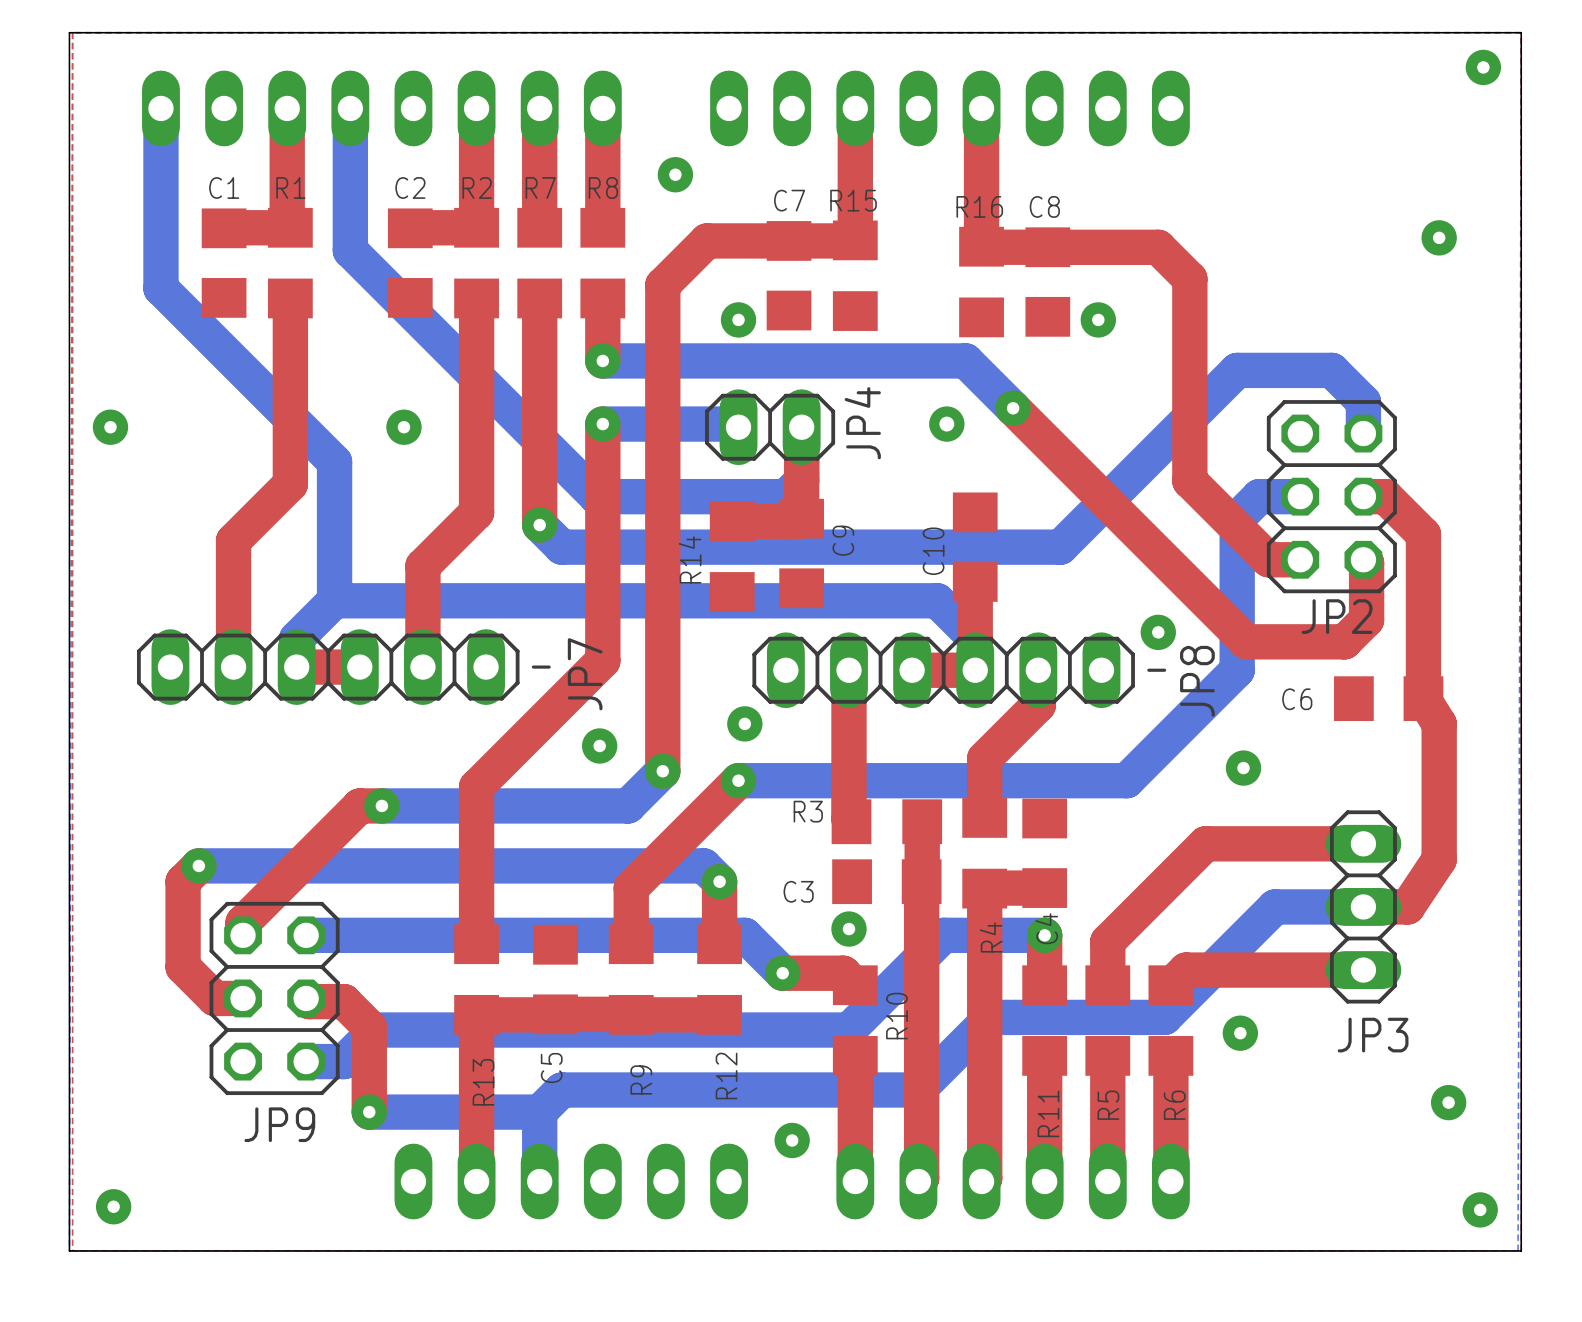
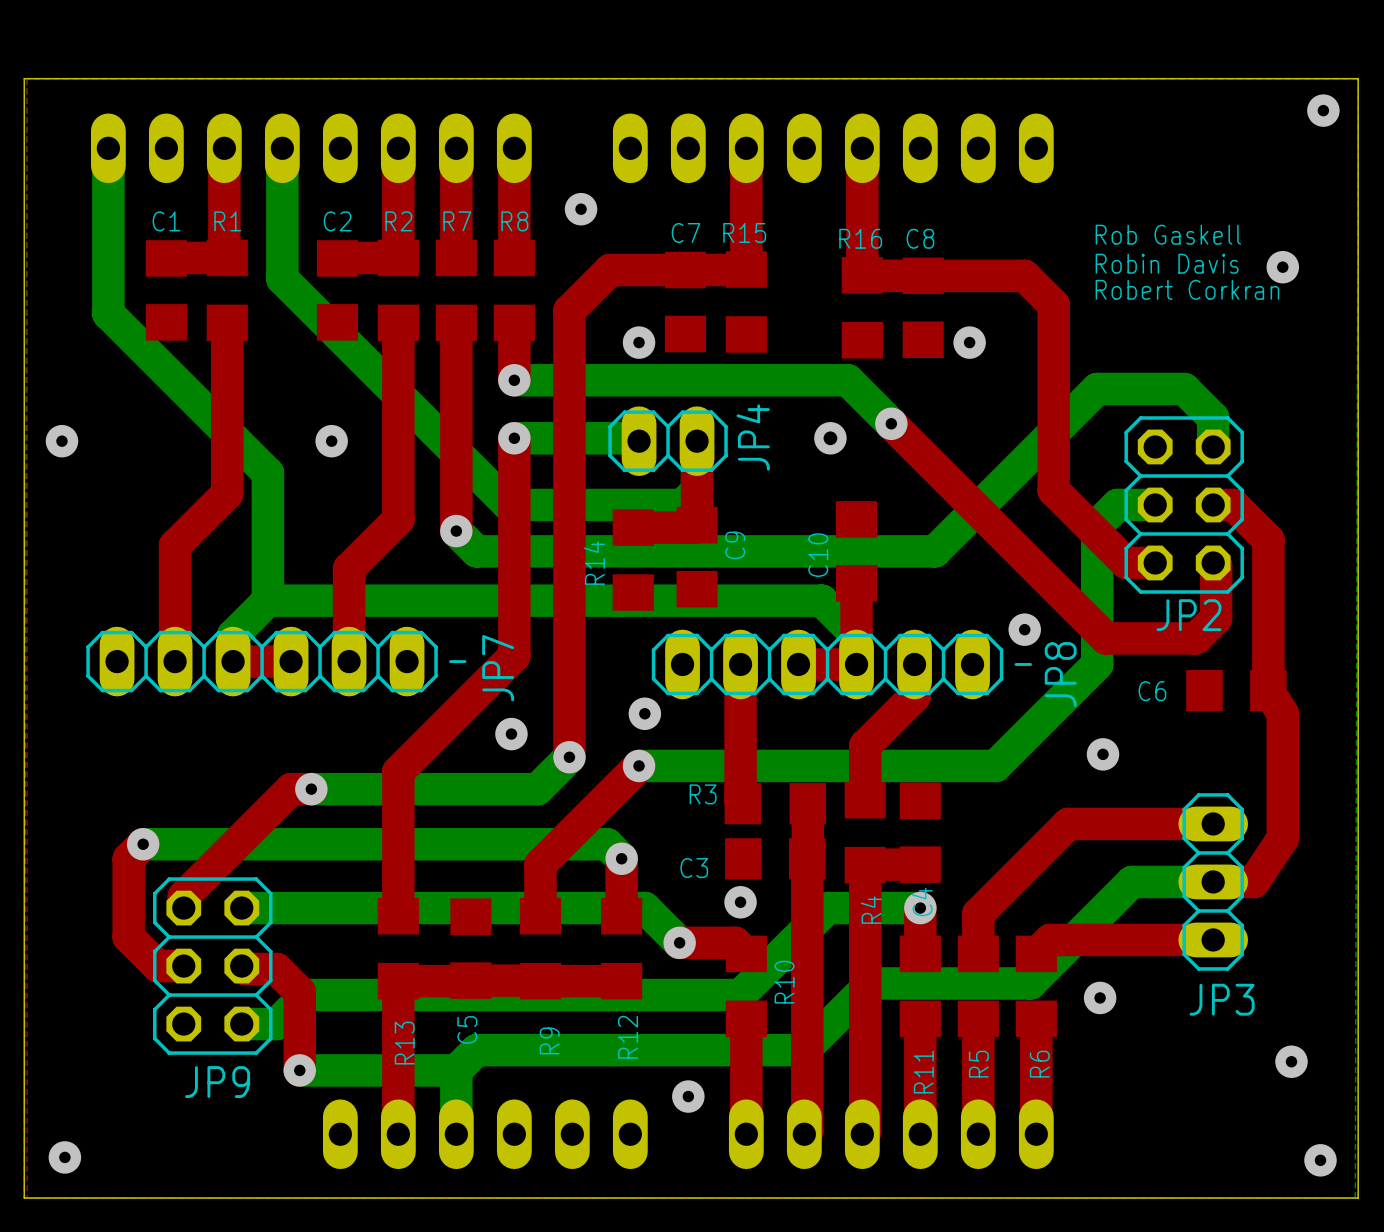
text: none -> Rob Gaskell (1168, 234)
text: none -> Robin Davis (1167, 263)
text: none -> Robert Corkran (1187, 289)

